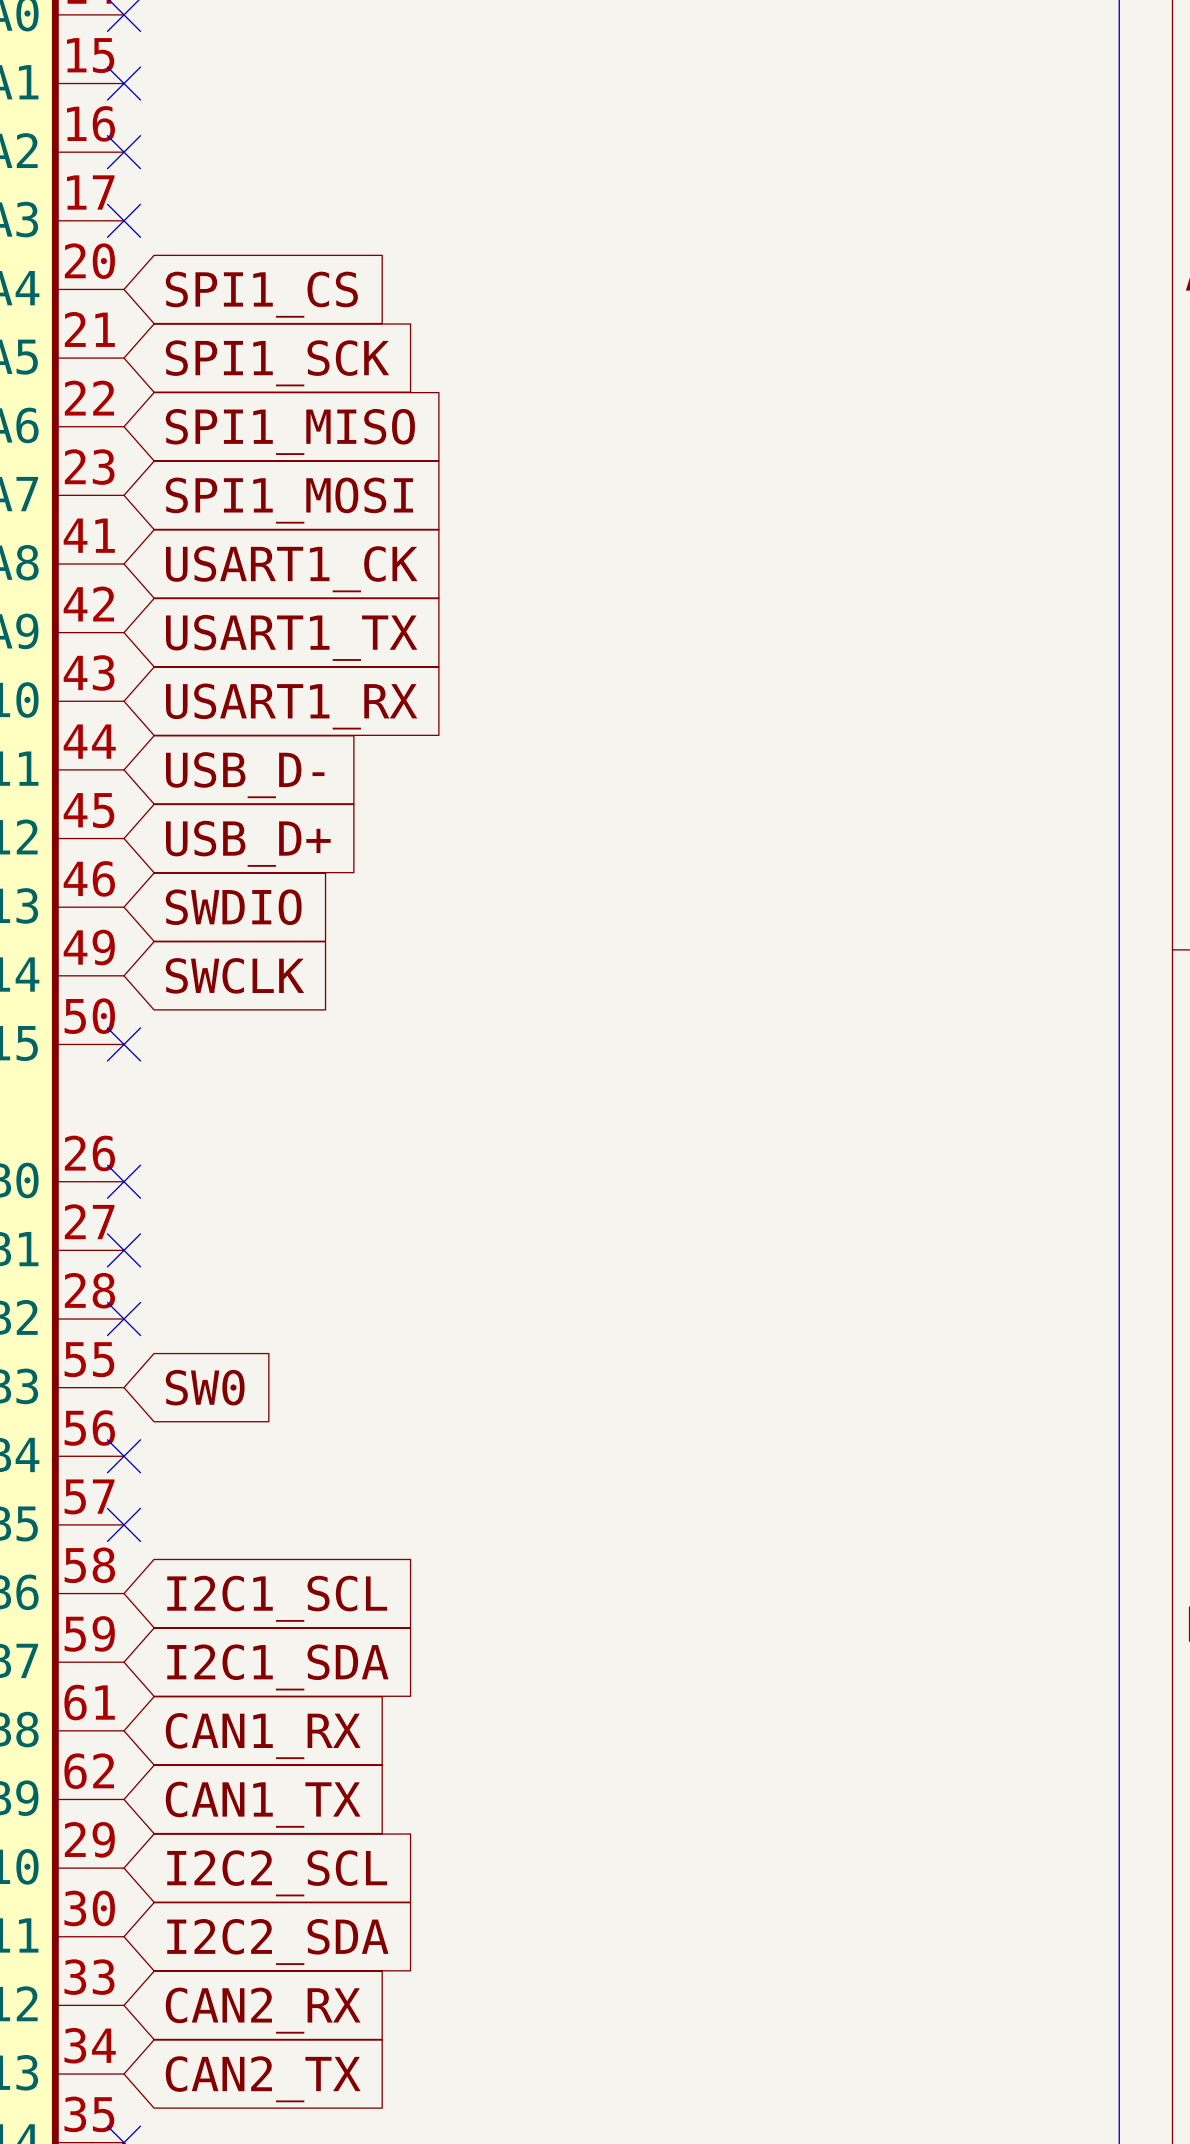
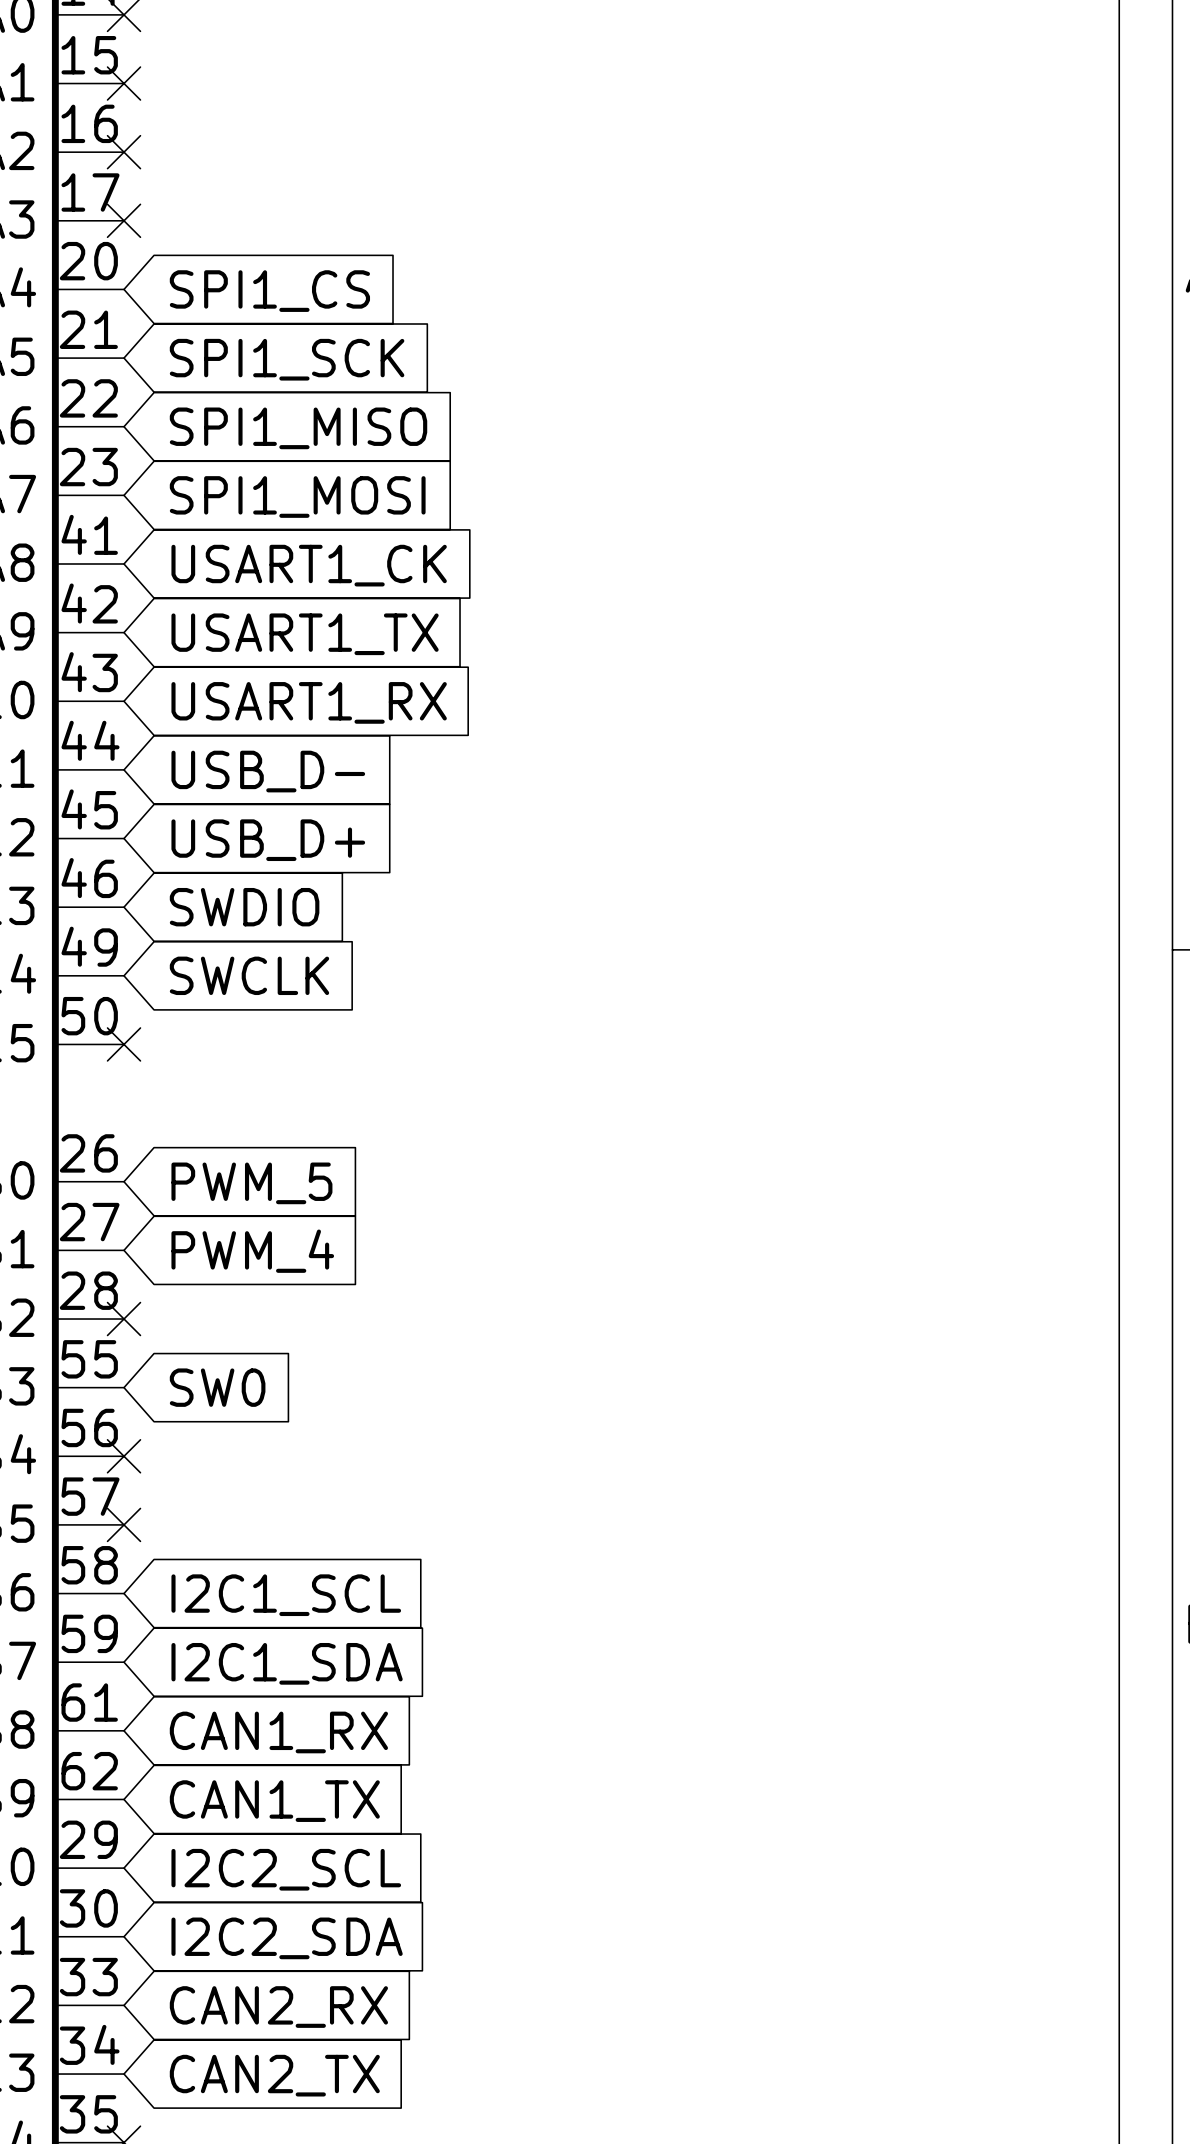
no-connect mark: (124, 1181) -> none
global label: none -> PWM_5 (251, 1183)
no-connect mark: (124, 1250) -> none
global label: none -> PWM_4 (252, 1251)

